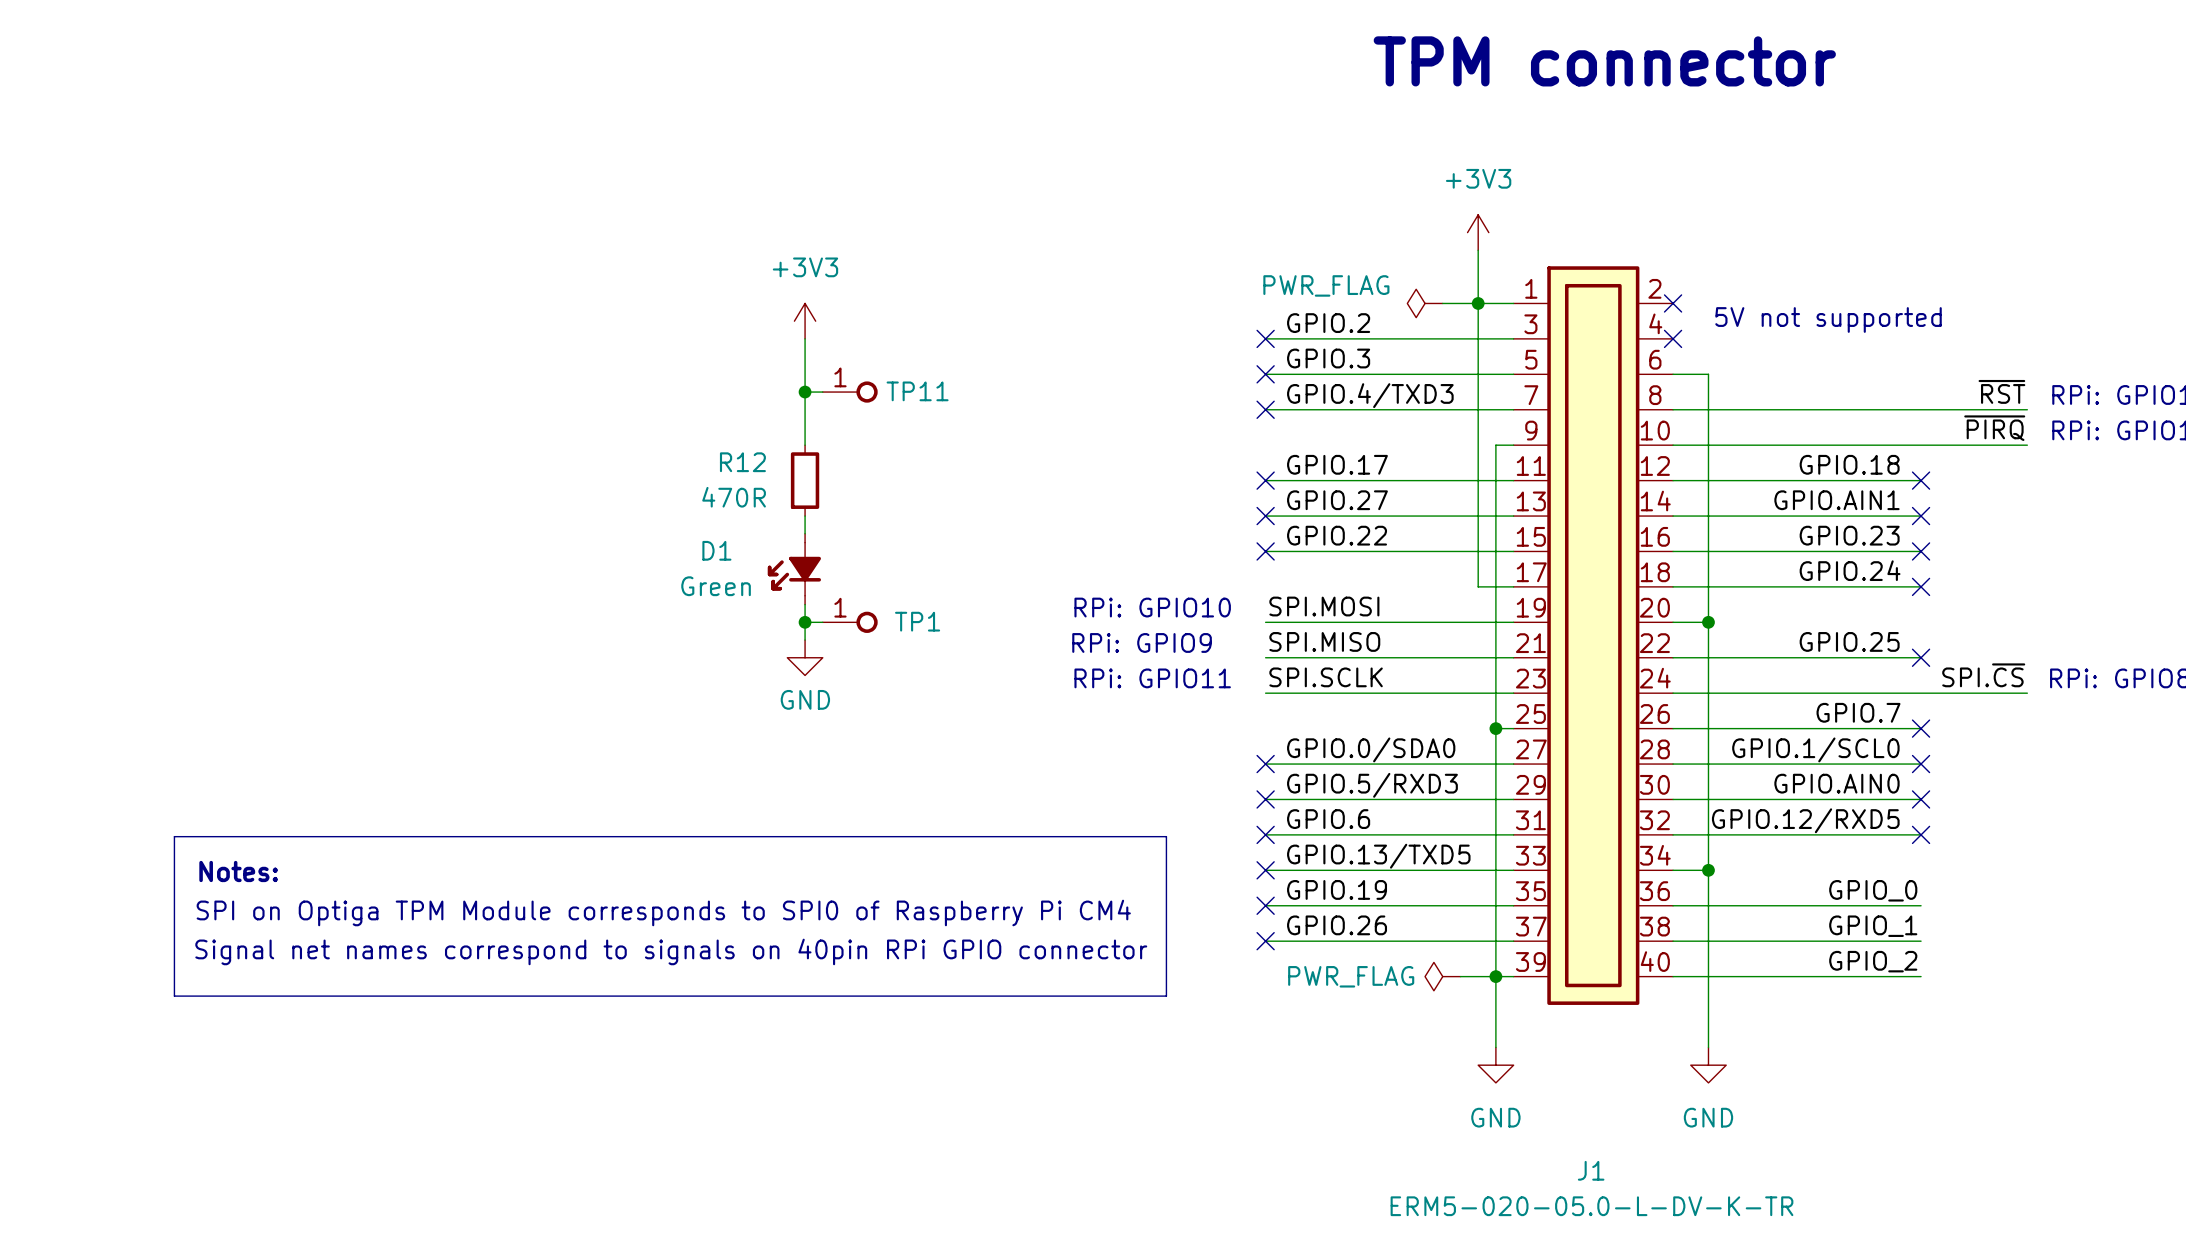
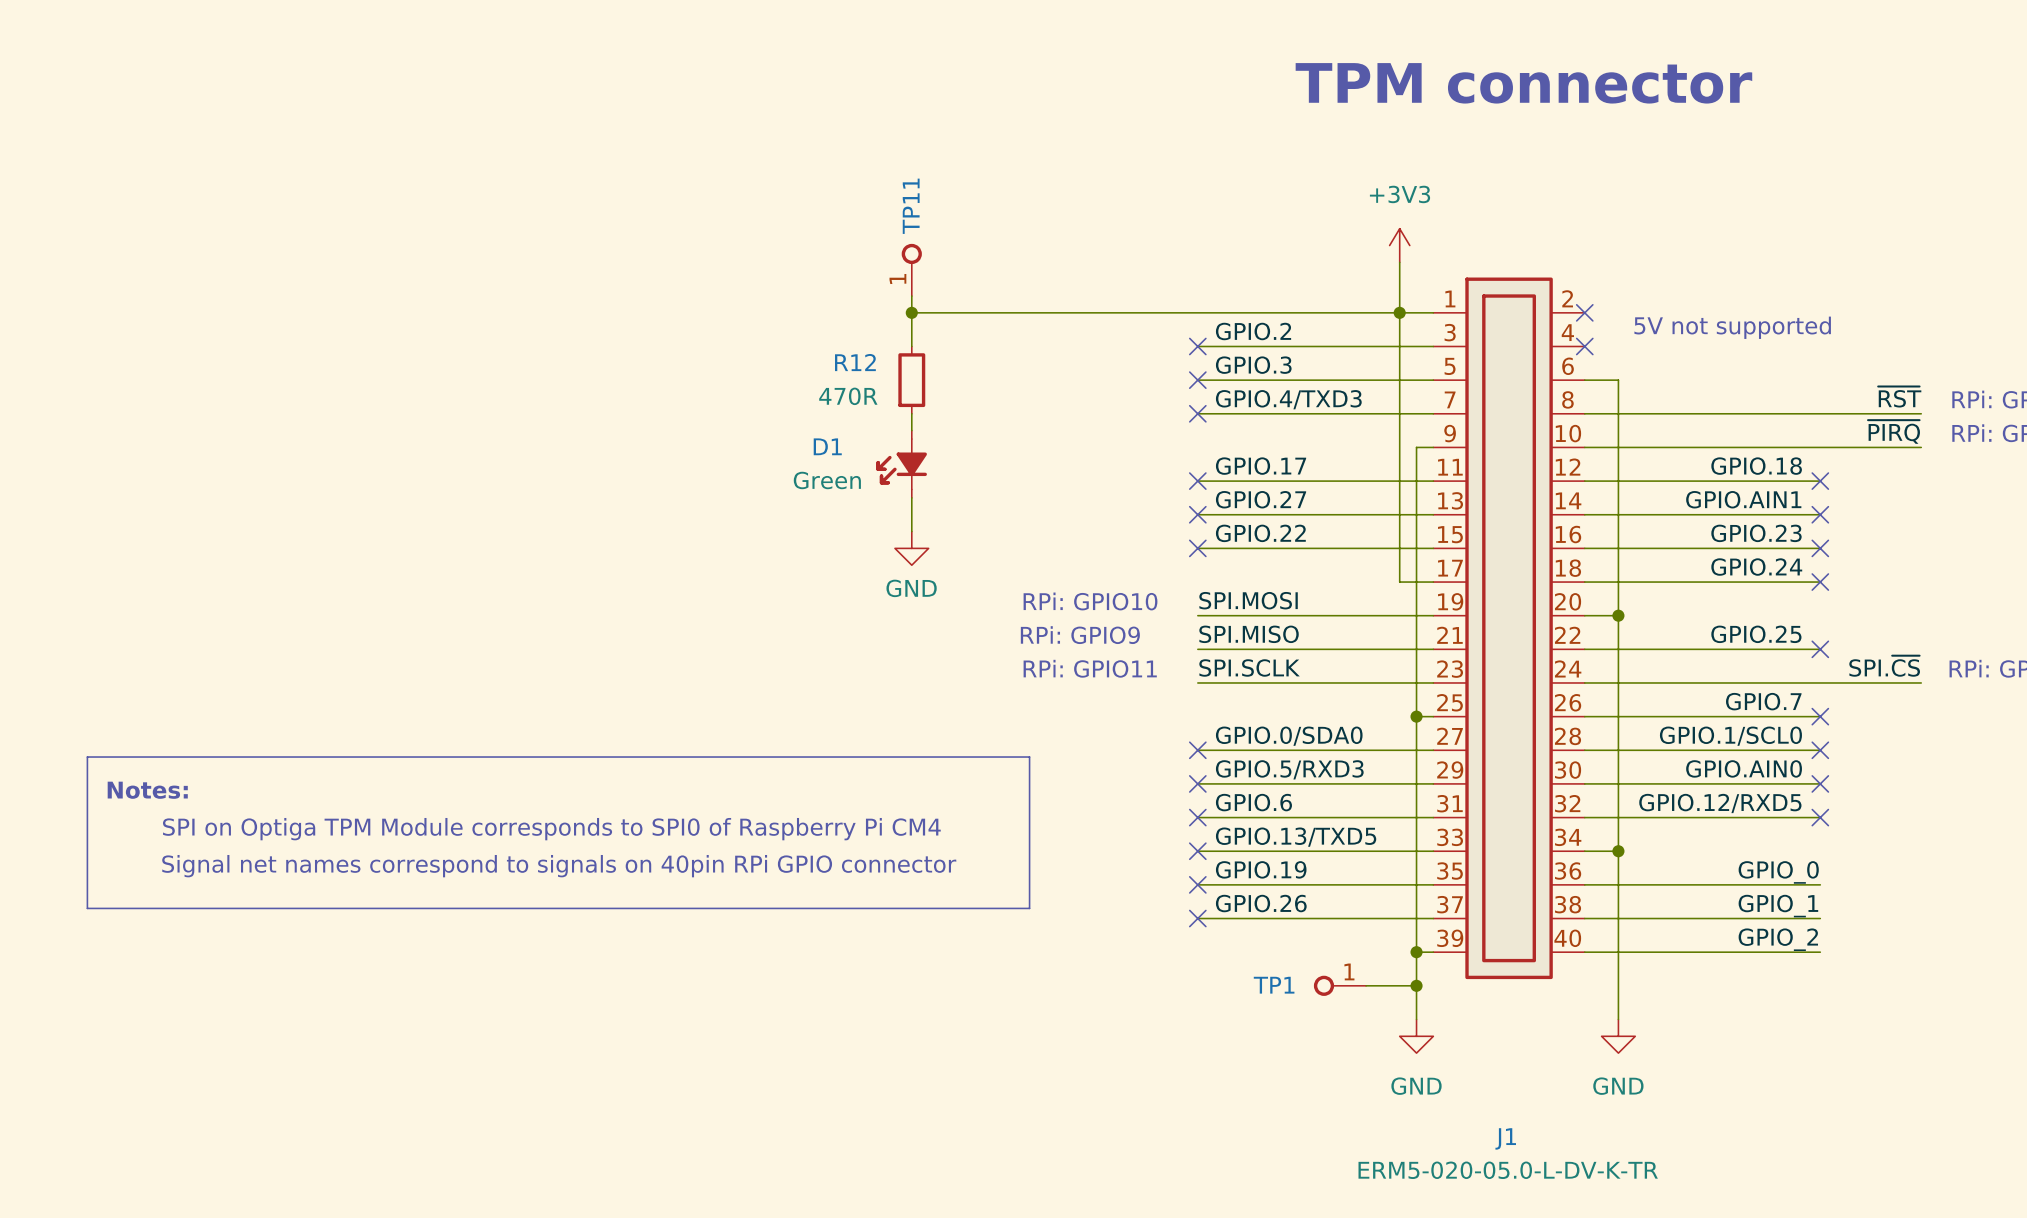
wire: none -> (911, 296) (911, 346)
wire: none -> (911, 312) (1366, 312)
junction: none -> (911, 312)
power symbol: PWR_FLAG (1425, 303) -> none
power symbol: +3V3 (805, 321) -> none
wire: (805, 338) (805, 445) -> none
wire: (805, 392) (822, 392) -> none
junction: (805, 392) -> none
TP11 position: (850, 392) -> (911, 269)
TP11 rotation: 0° (867, 392) -> 90° counterclockwise (911, 253)
R12 position: (805, 480) -> (911, 380)
wire: (805, 516) (805, 533) -> (911, 413) (911, 430)
D1 position: (794, 569) -> (901, 464)
wire: (805, 604) (805, 640) -> (911, 497) (911, 531)
wire: (805, 622) (822, 622) -> none
junction: (805, 622) -> none
TP1 position: (850, 622) -> (1339, 985)
TP1 rotation: 0° (867, 622) -> 180° (1323, 985)
power symbol position: GND (805, 657) -> GND (911, 548)
line: (174, 836) (1166, 836) (1166, 996) (174, 996) (174, 836) -> (87, 757) (1029, 757) (1029, 908) (87, 908) (87, 757)
text position: Notes: (238, 871) -> Notes: (147, 790)
text position: SPI on Optiga TPM Module corresponds to SPI0 of Raspberry Pi CM4 (663, 912) -> SPI on Optiga TPM Module corresponds to SPI0 of Raspberry Pi CM4 (551, 829)
text position: Signal net names correspond to signals on 40pin RPi GPIO connector (671, 951) -> Signal net names correspond to signals on 40pin RPi GPIO connector (559, 866)
power symbol: PWR_FLAG (1442, 976) -> none
wire: (1460, 976) (1495, 976) -> none
wire: none -> (1366, 985) (1416, 985)
junction: none -> (1416, 985)

